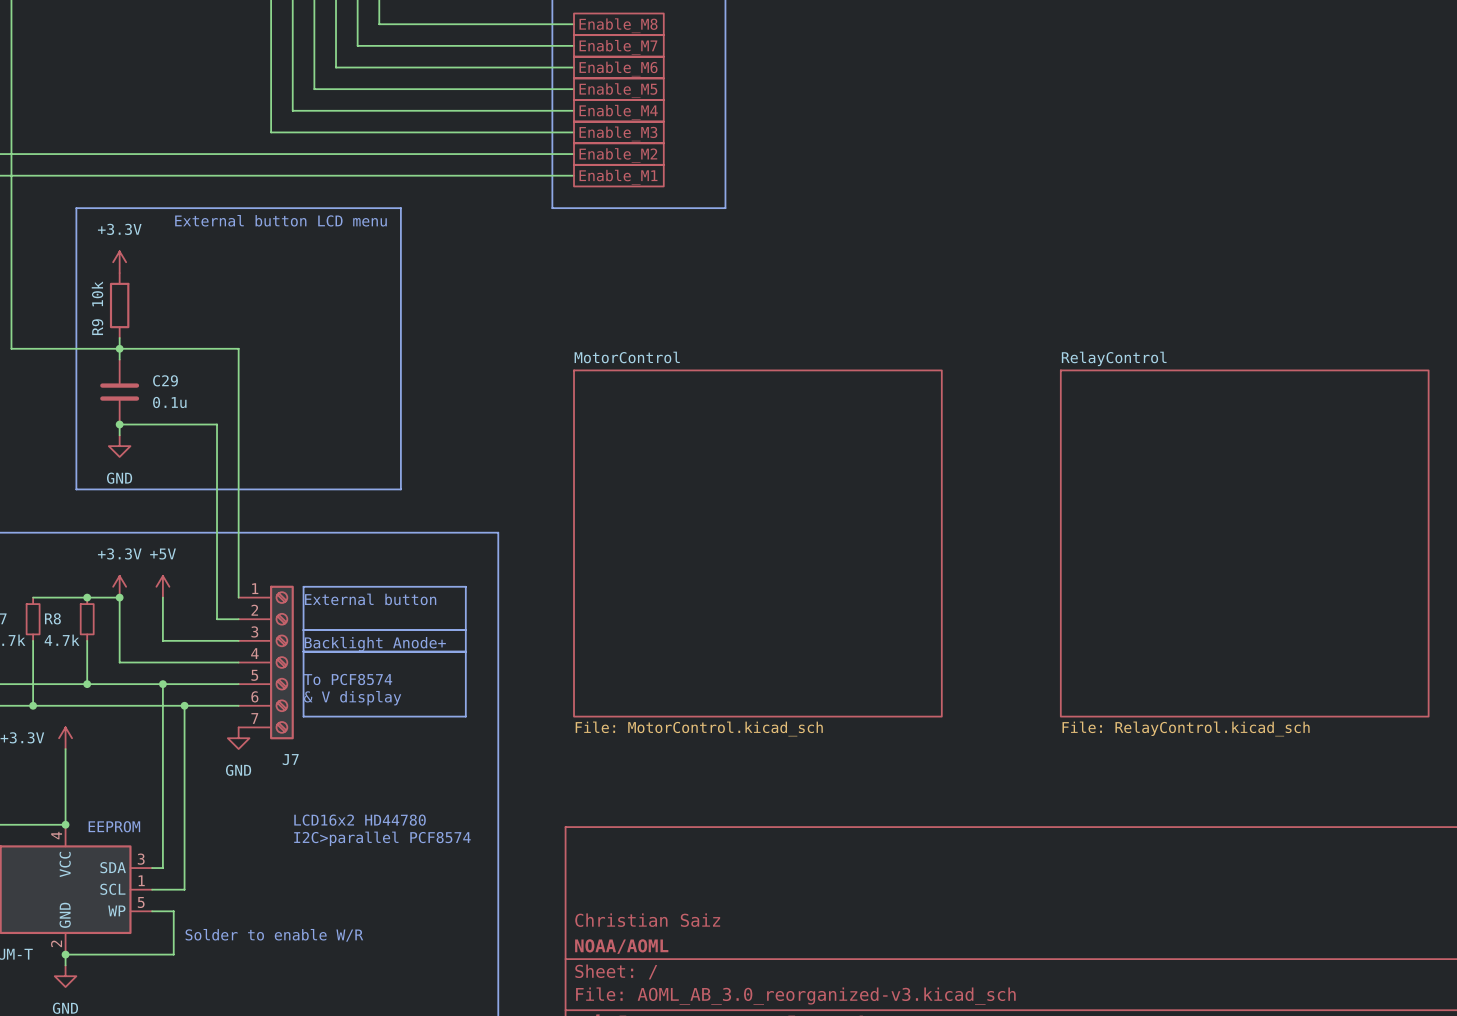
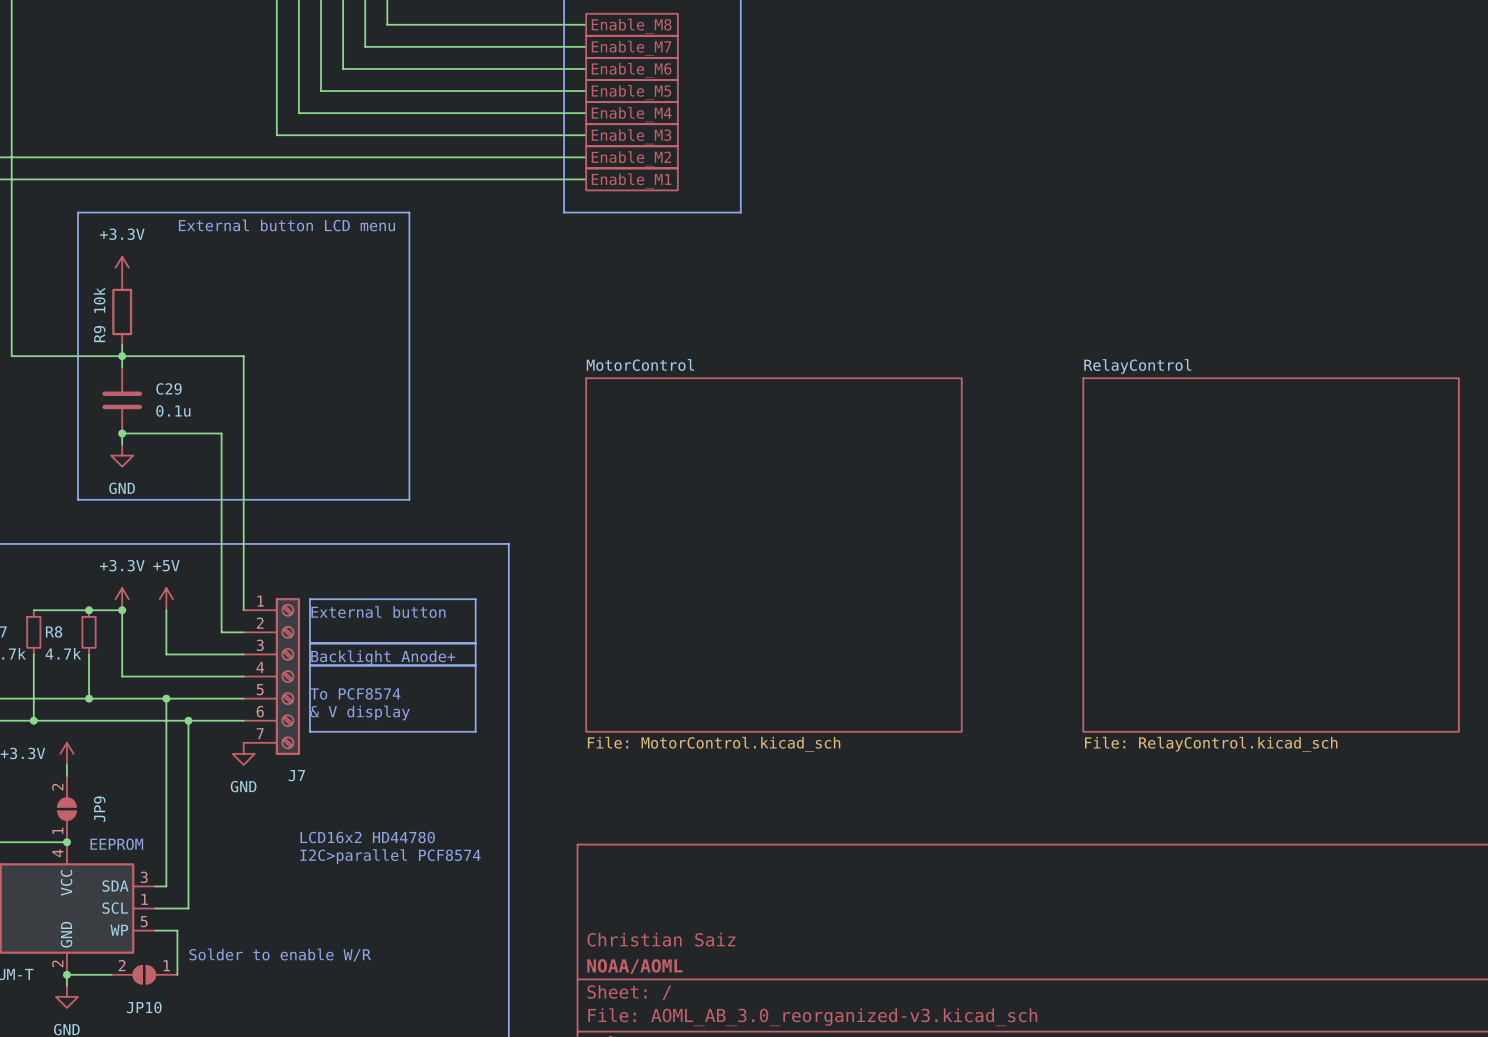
JP9: none -> (66, 809)
JP10: none -> (144, 974)

